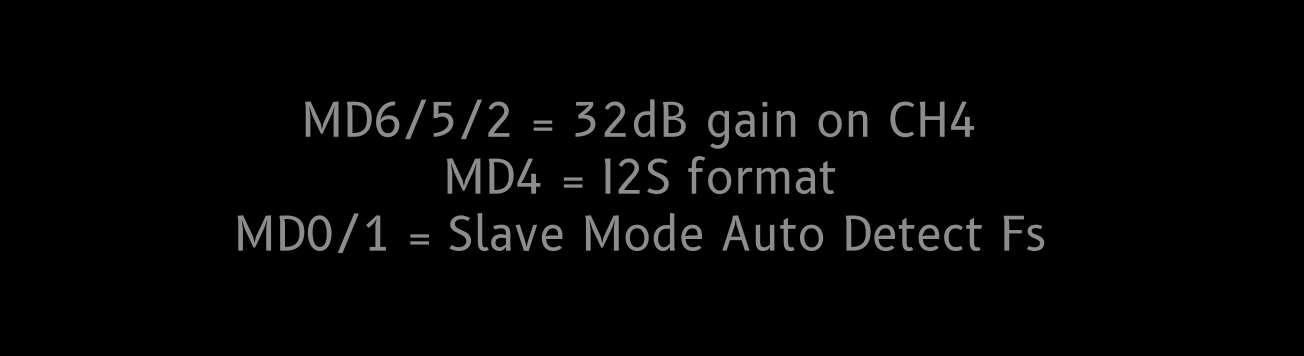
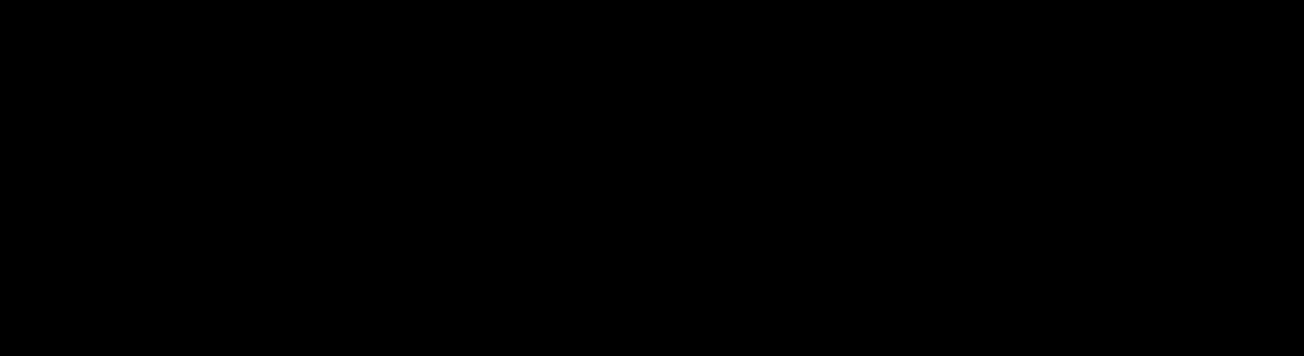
text: MD6/5/2 = 32dB gain on CH4 (639, 123) -> none
text: MD4 = I2S format (641, 175) -> none
text: MD0/1 = Slave Mode Auto Detect Fs (640, 232) -> none

